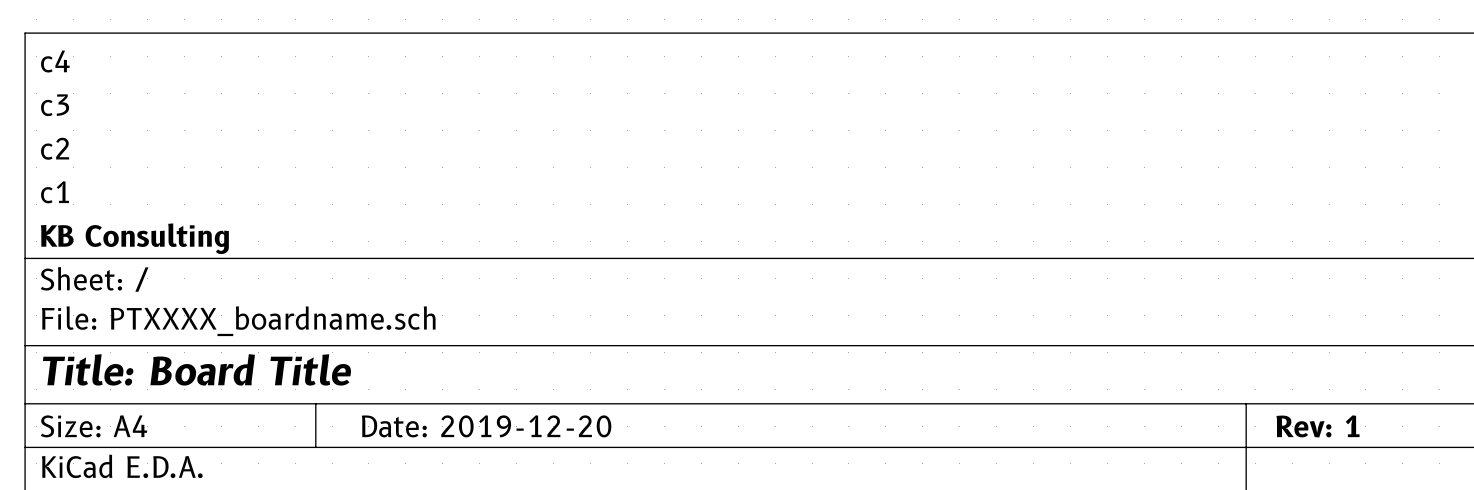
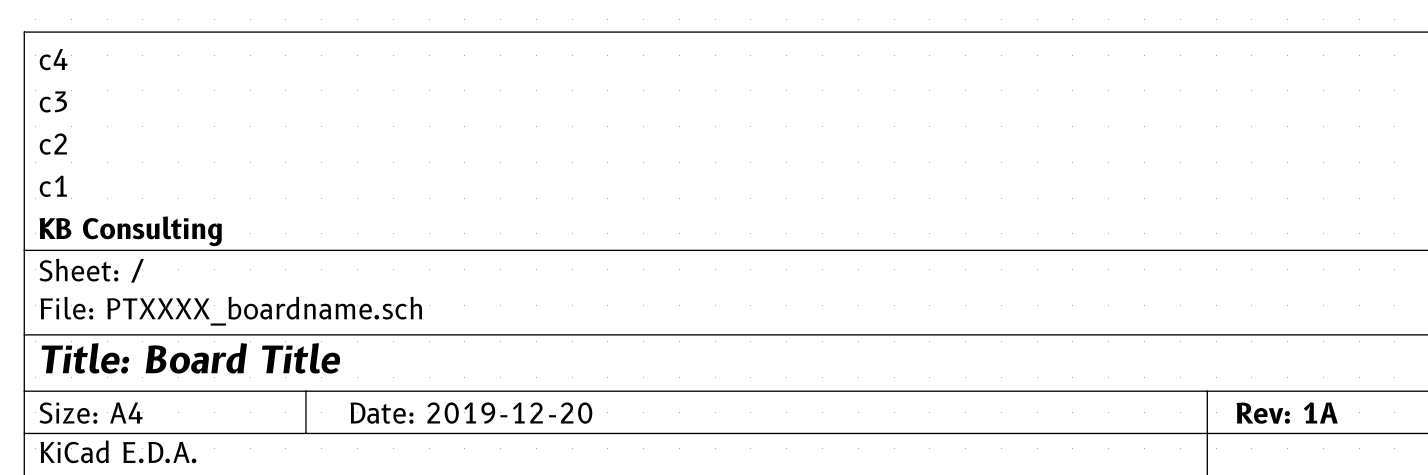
title block: Rev: 1 (1318, 426) -> Rev: 1A (1287, 413)

